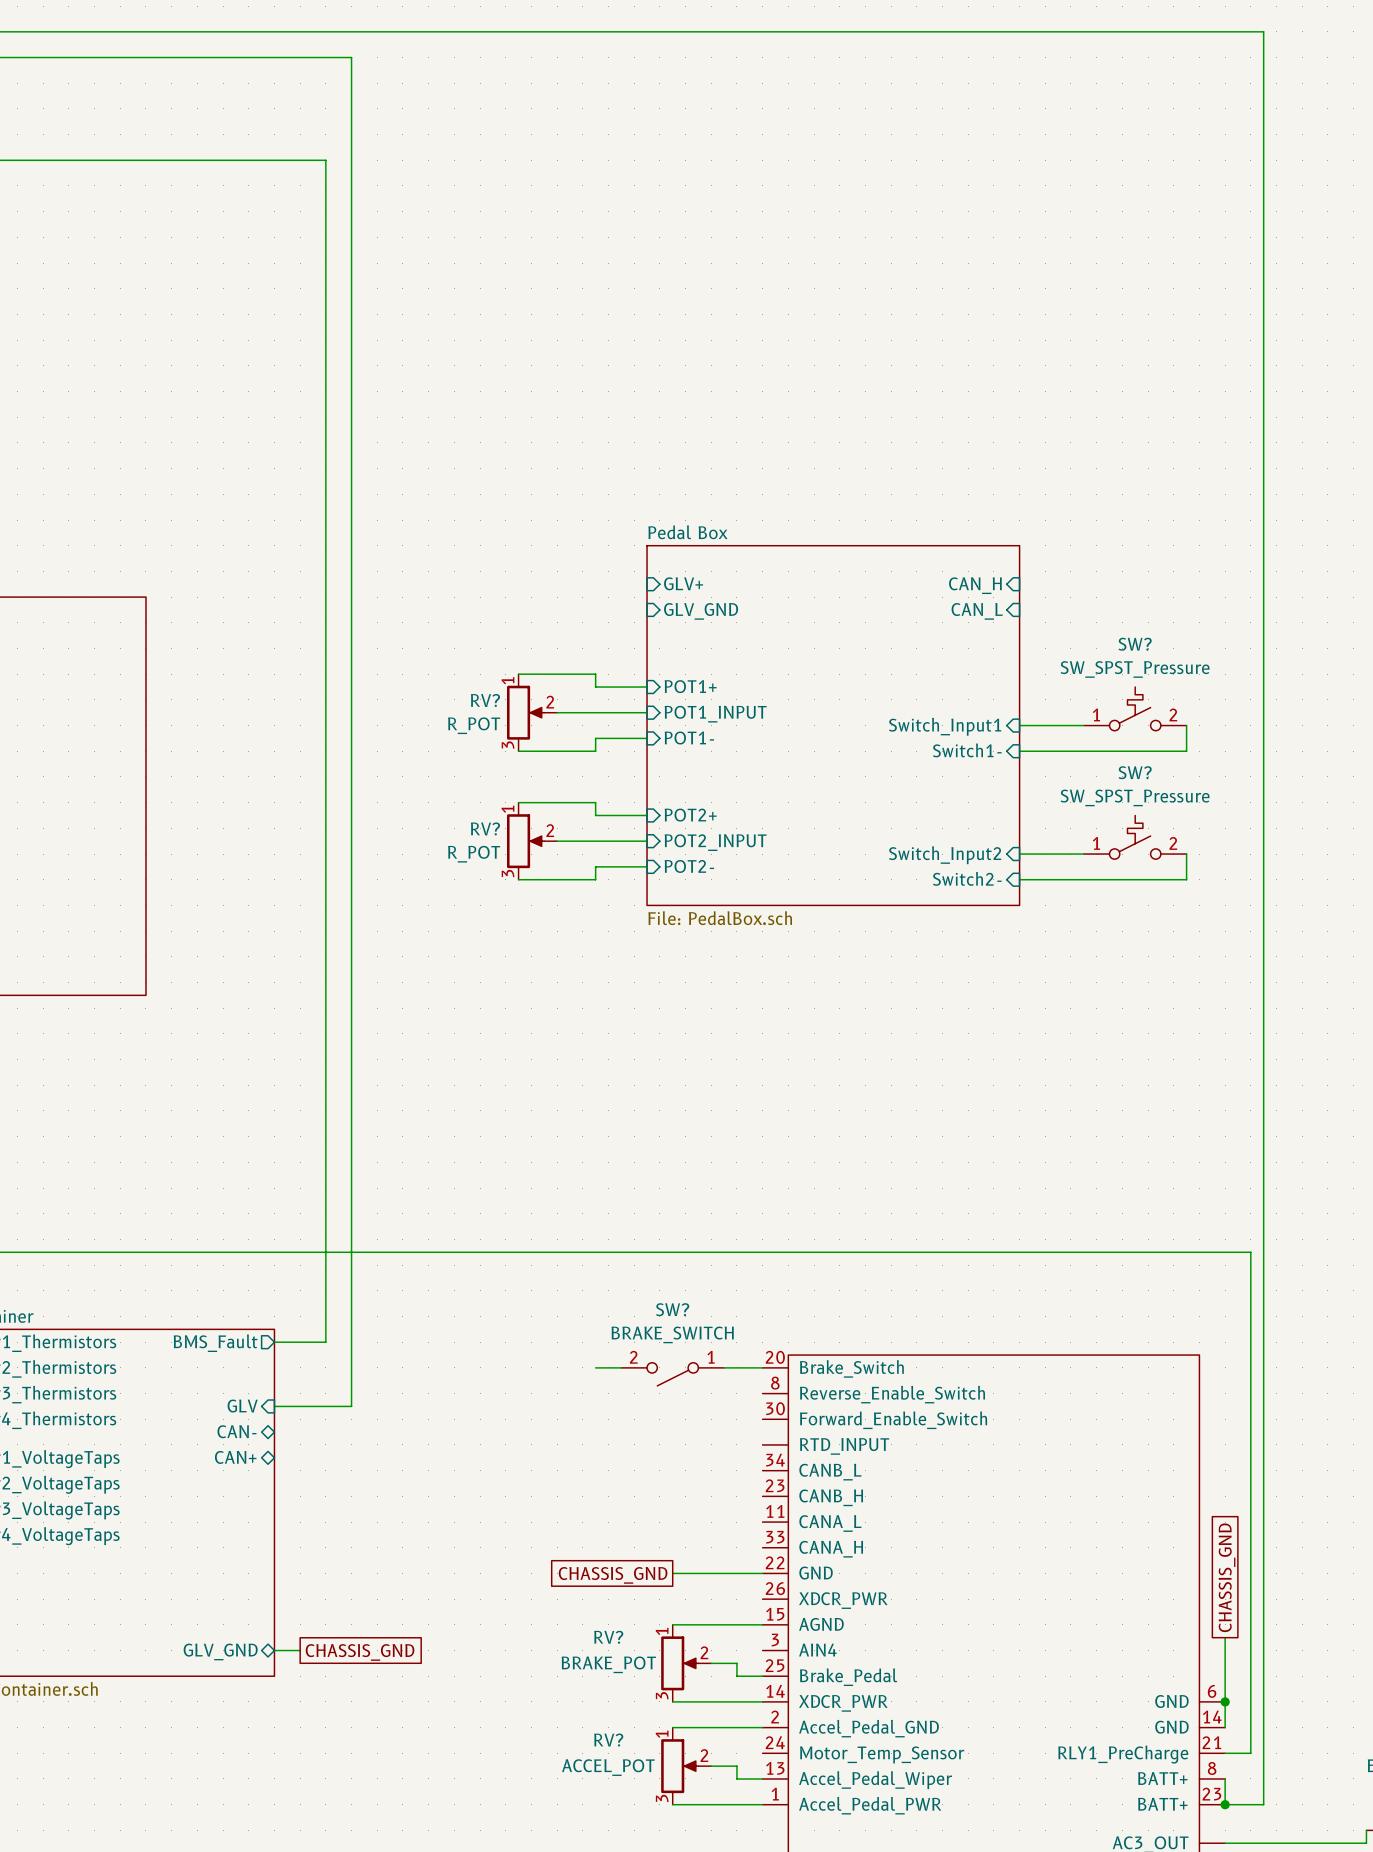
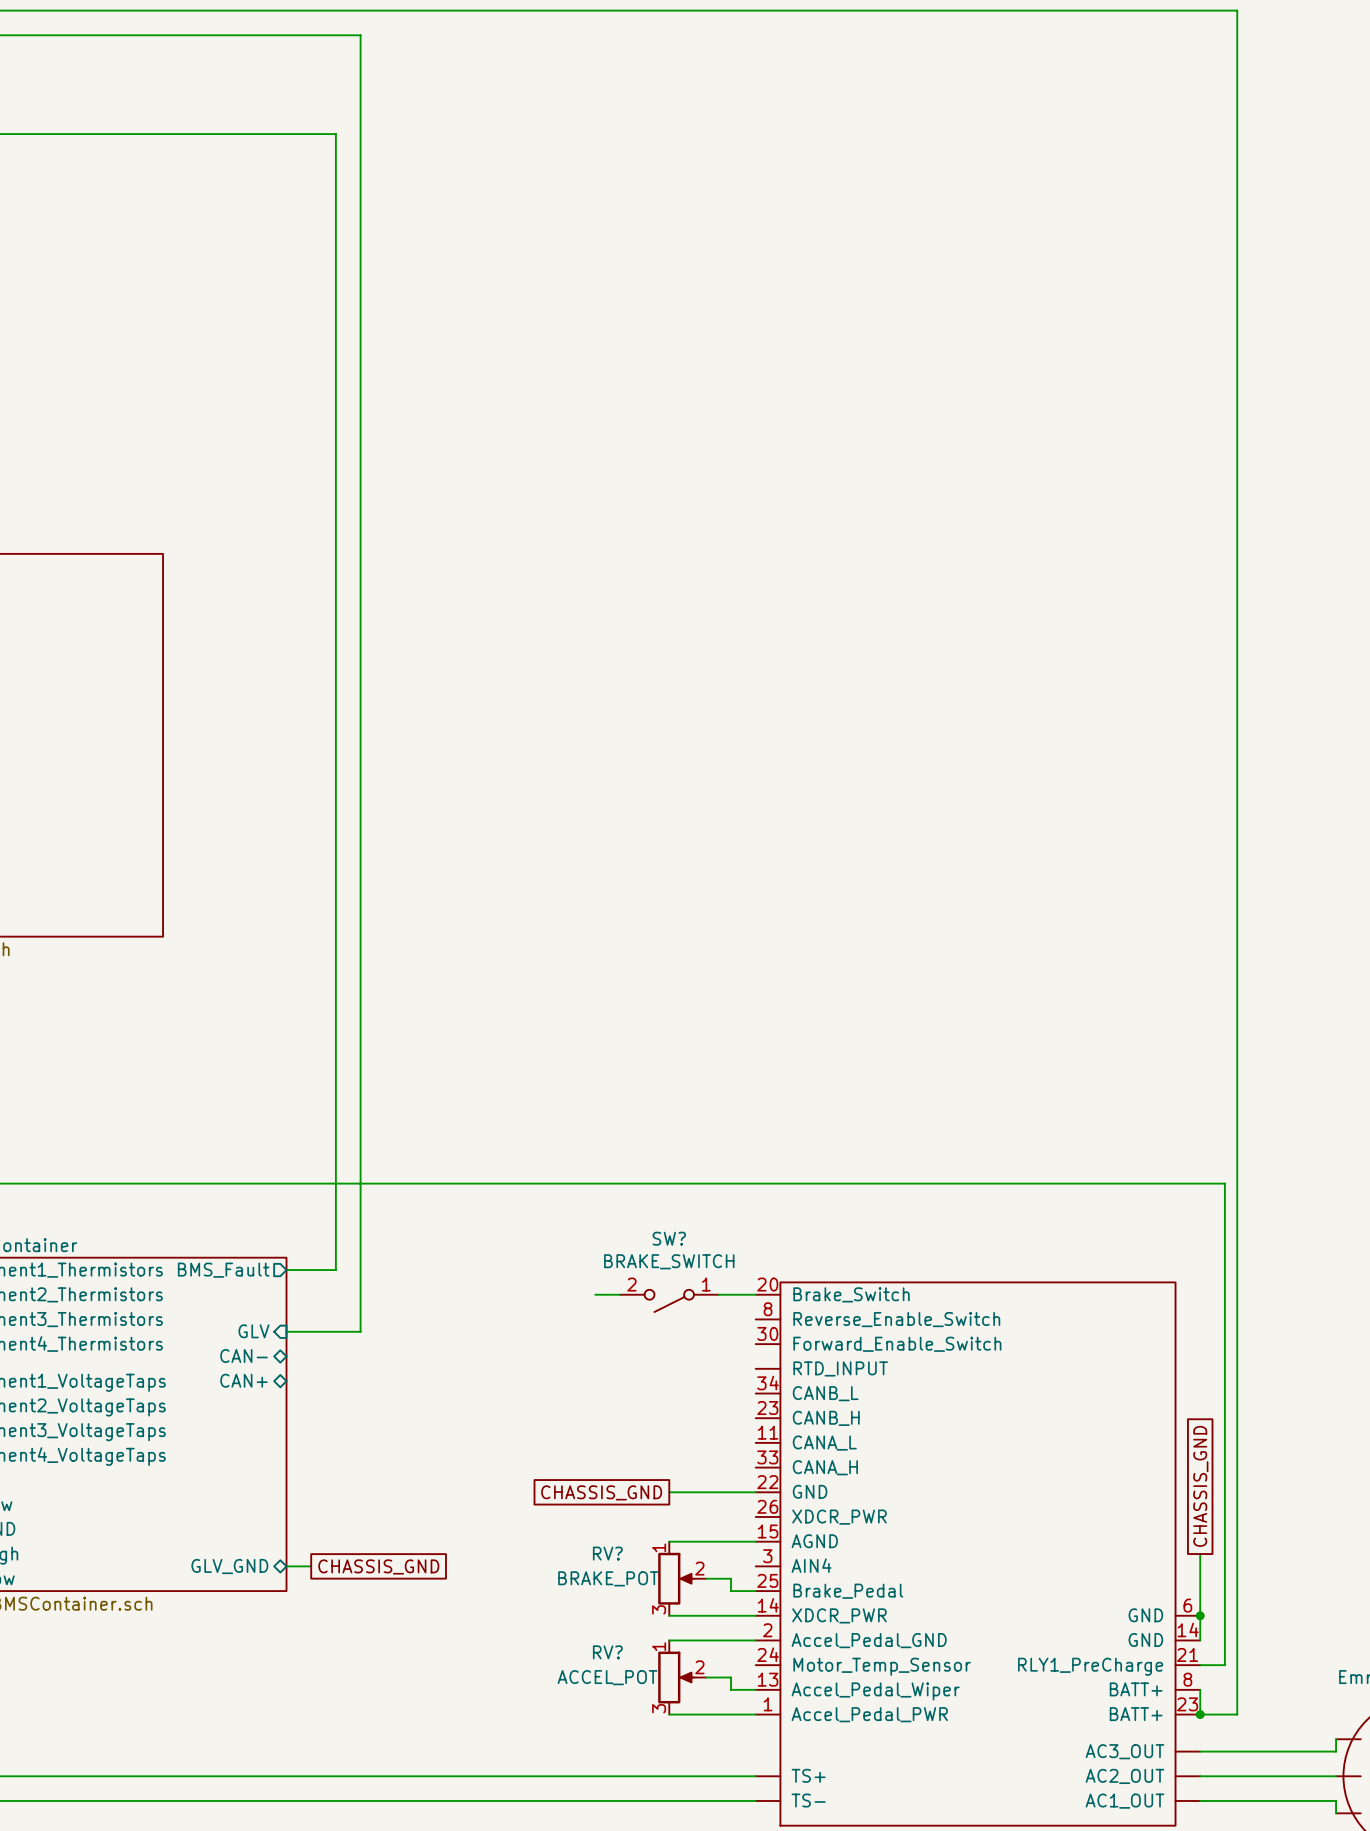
sheet pin: GLV+ (683, 583) -> none
sheet pin: CAN_H (975, 585) -> none
sheet pin: GLV_GND (701, 611) -> none
sheet pin: CAN_L (977, 611) -> none
wire: (518, 674) (595, 674) (595, 687) (647, 687) -> none
sheet pin: POT1+ (690, 686) -> none
SW?: SW_SPST_Pressure (1135, 708) -> none
RV?: R_POT (532, 712) -> none
wire: (557, 712) (647, 712) -> none
sheet pin: POT1_INPUT (715, 714) -> none
sheet Pedal Box: File: PedalBox.sch (833, 725) -> none
wire: (1019, 725) (1083, 725) -> none
wire: (1186, 725) (1186, 751) (1019, 751) -> none
sheet pin: Switch_Input1 (945, 726) -> none
sheet pin: POT1- (689, 737) -> none
wire: (647, 738) (595, 738) (595, 751) (518, 751) -> none
sheet pin: Switch1- (967, 750) -> none
wire: (518, 802) (595, 802) (595, 815) (647, 815) -> none
sheet pin: POT2+ (690, 815) -> none
SW?: SW_SPST_Pressure (1135, 837) -> none
RV?: R_POT (532, 841) -> none
wire: (557, 841) (647, 841) -> none
sheet pin: POT2_INPUT (715, 842) -> none
wire: (1019, 854) (1083, 854) -> none
wire: (1186, 854) (1186, 879) (1019, 879) -> none
sheet pin: Switch_Input2 (945, 855) -> none
wire: (647, 866) (595, 866) (595, 879) (518, 879) -> none
sheet pin: POT2- (689, 866) -> none
sheet pin: Switch2- (967, 878) -> none

